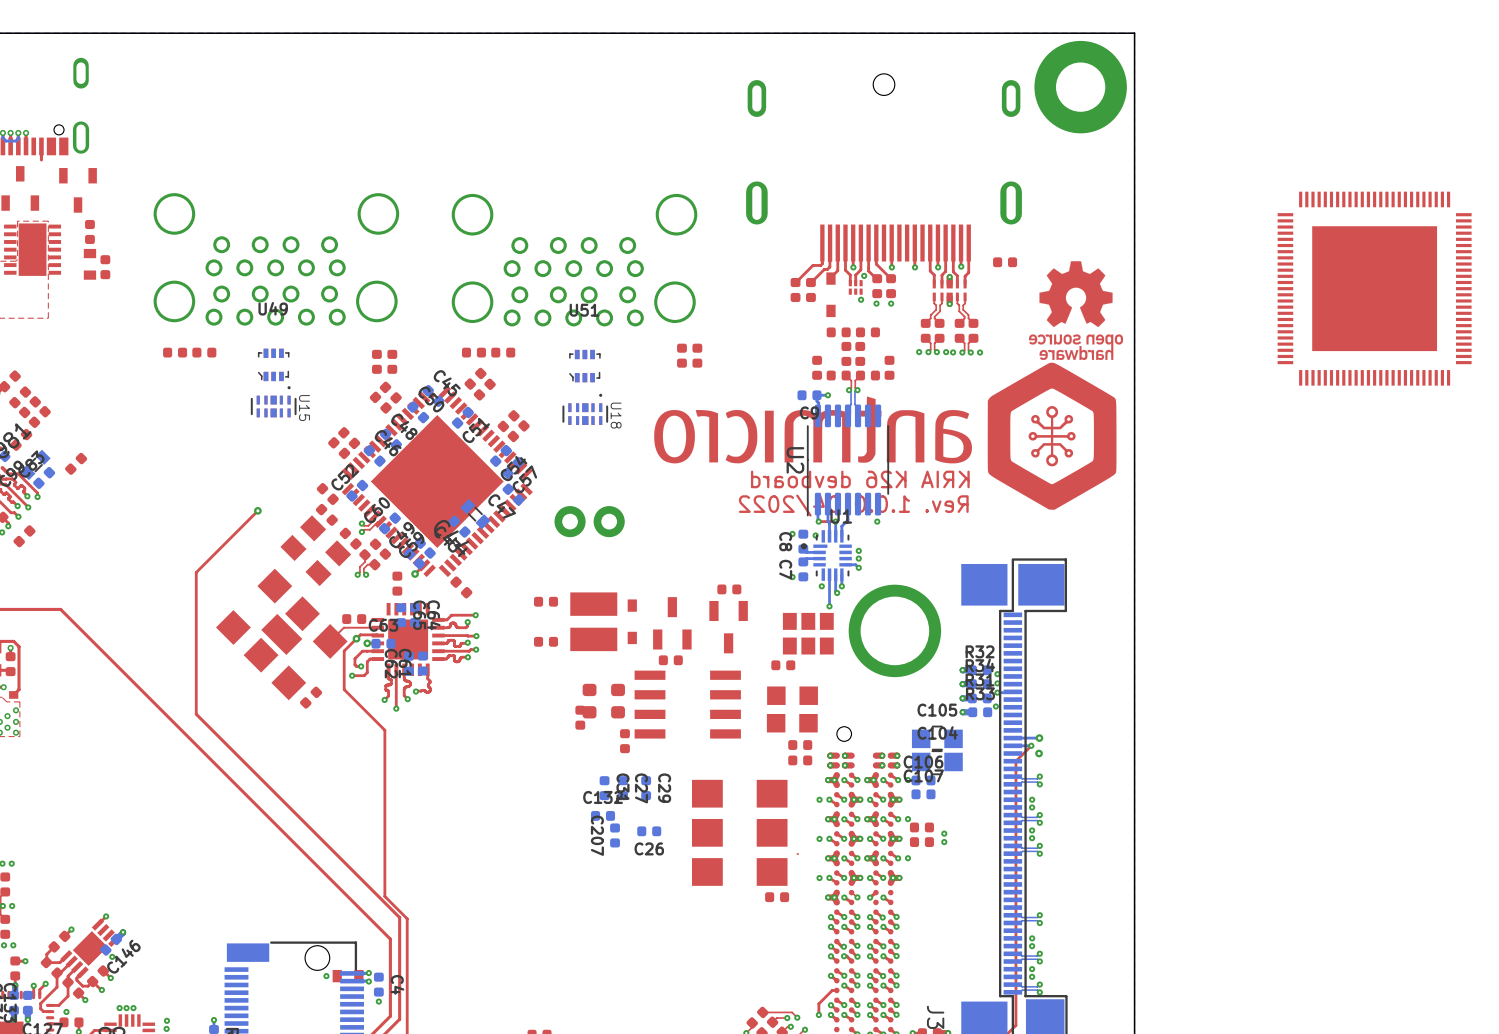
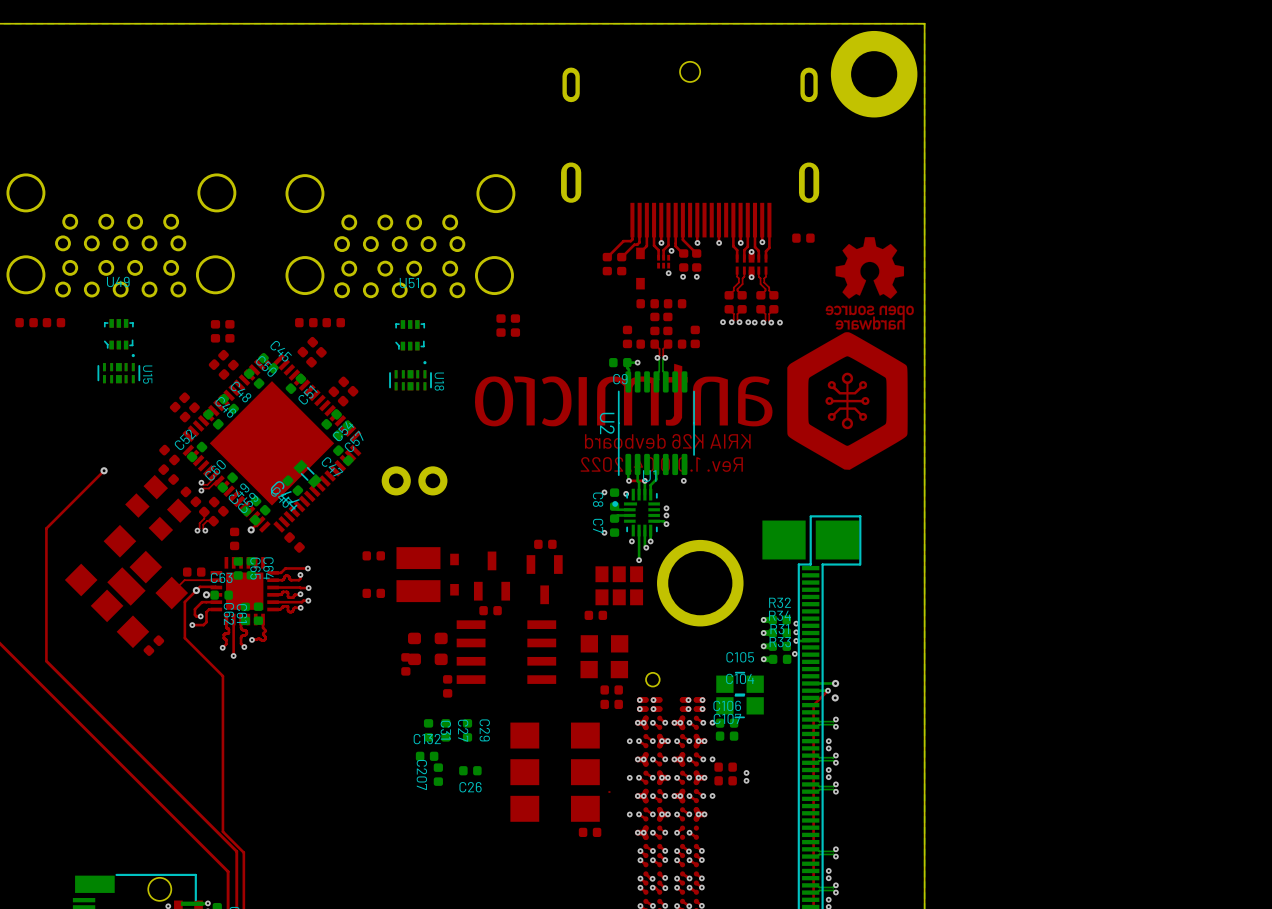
part: (1374, 288) -> none

